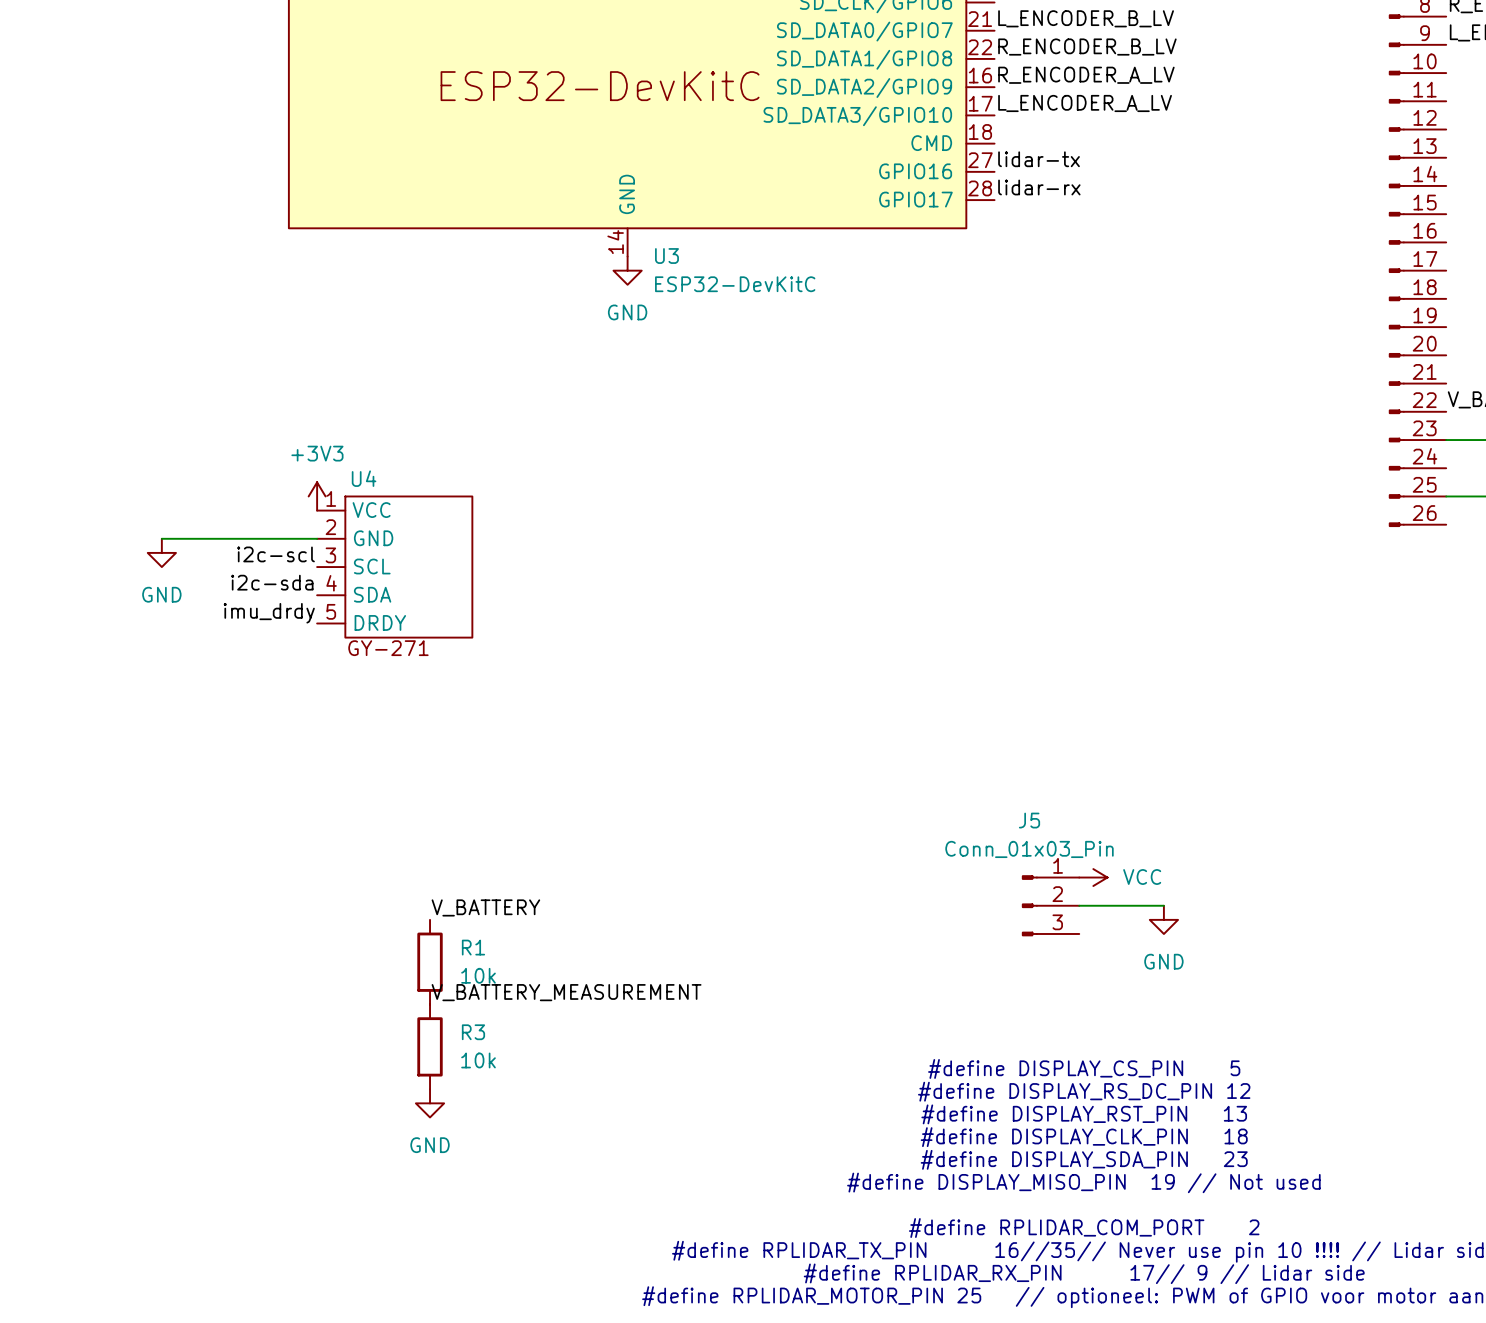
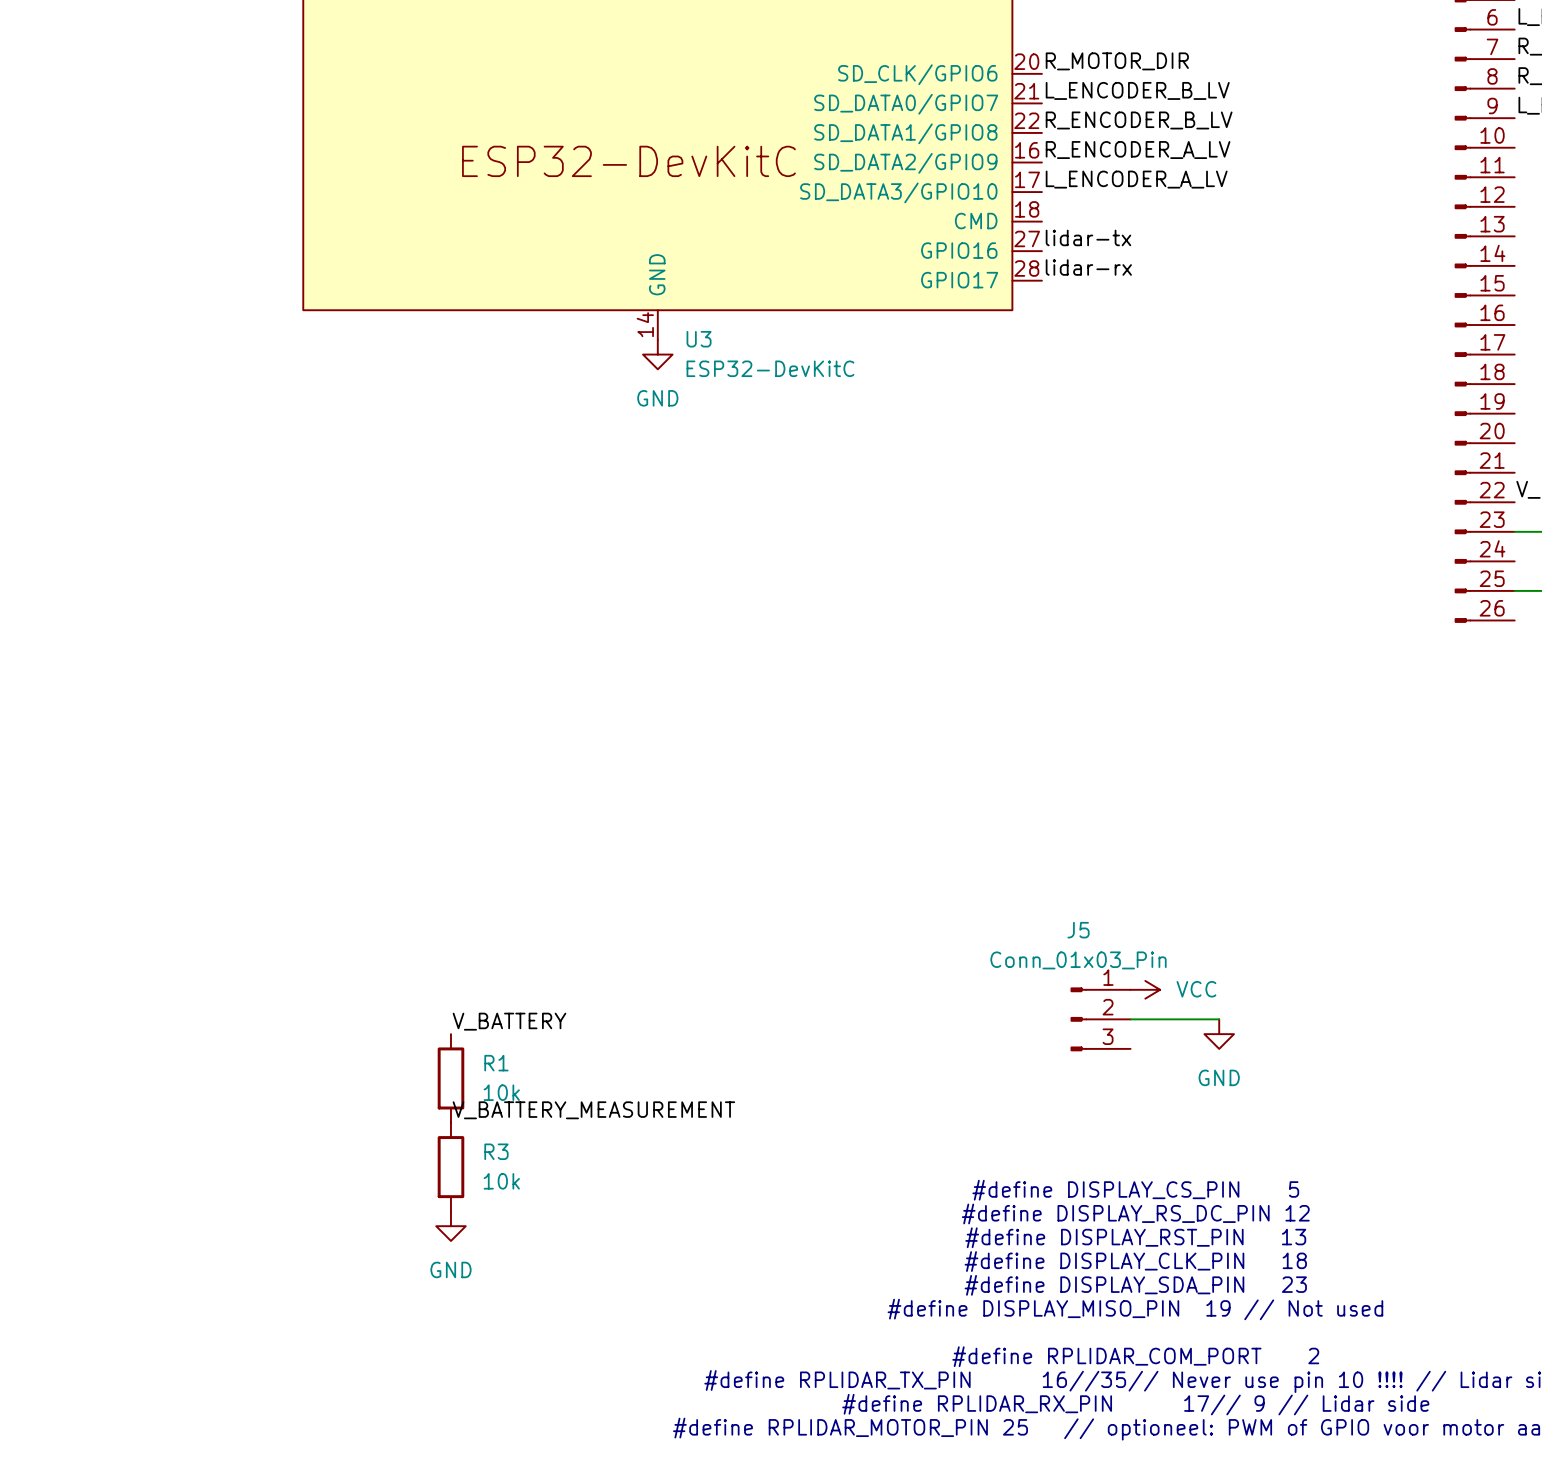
power symbol: +3V3 (317, 496) -> none
wire: (161, 538) (317, 538) -> none
power symbol: GND (161, 552) -> none
label: i2c-scl (276, 554) -> none
U4: (394, 567) -> none
label: i2c-sda (272, 582) -> none
label: imu_drdy (269, 613) -> none

